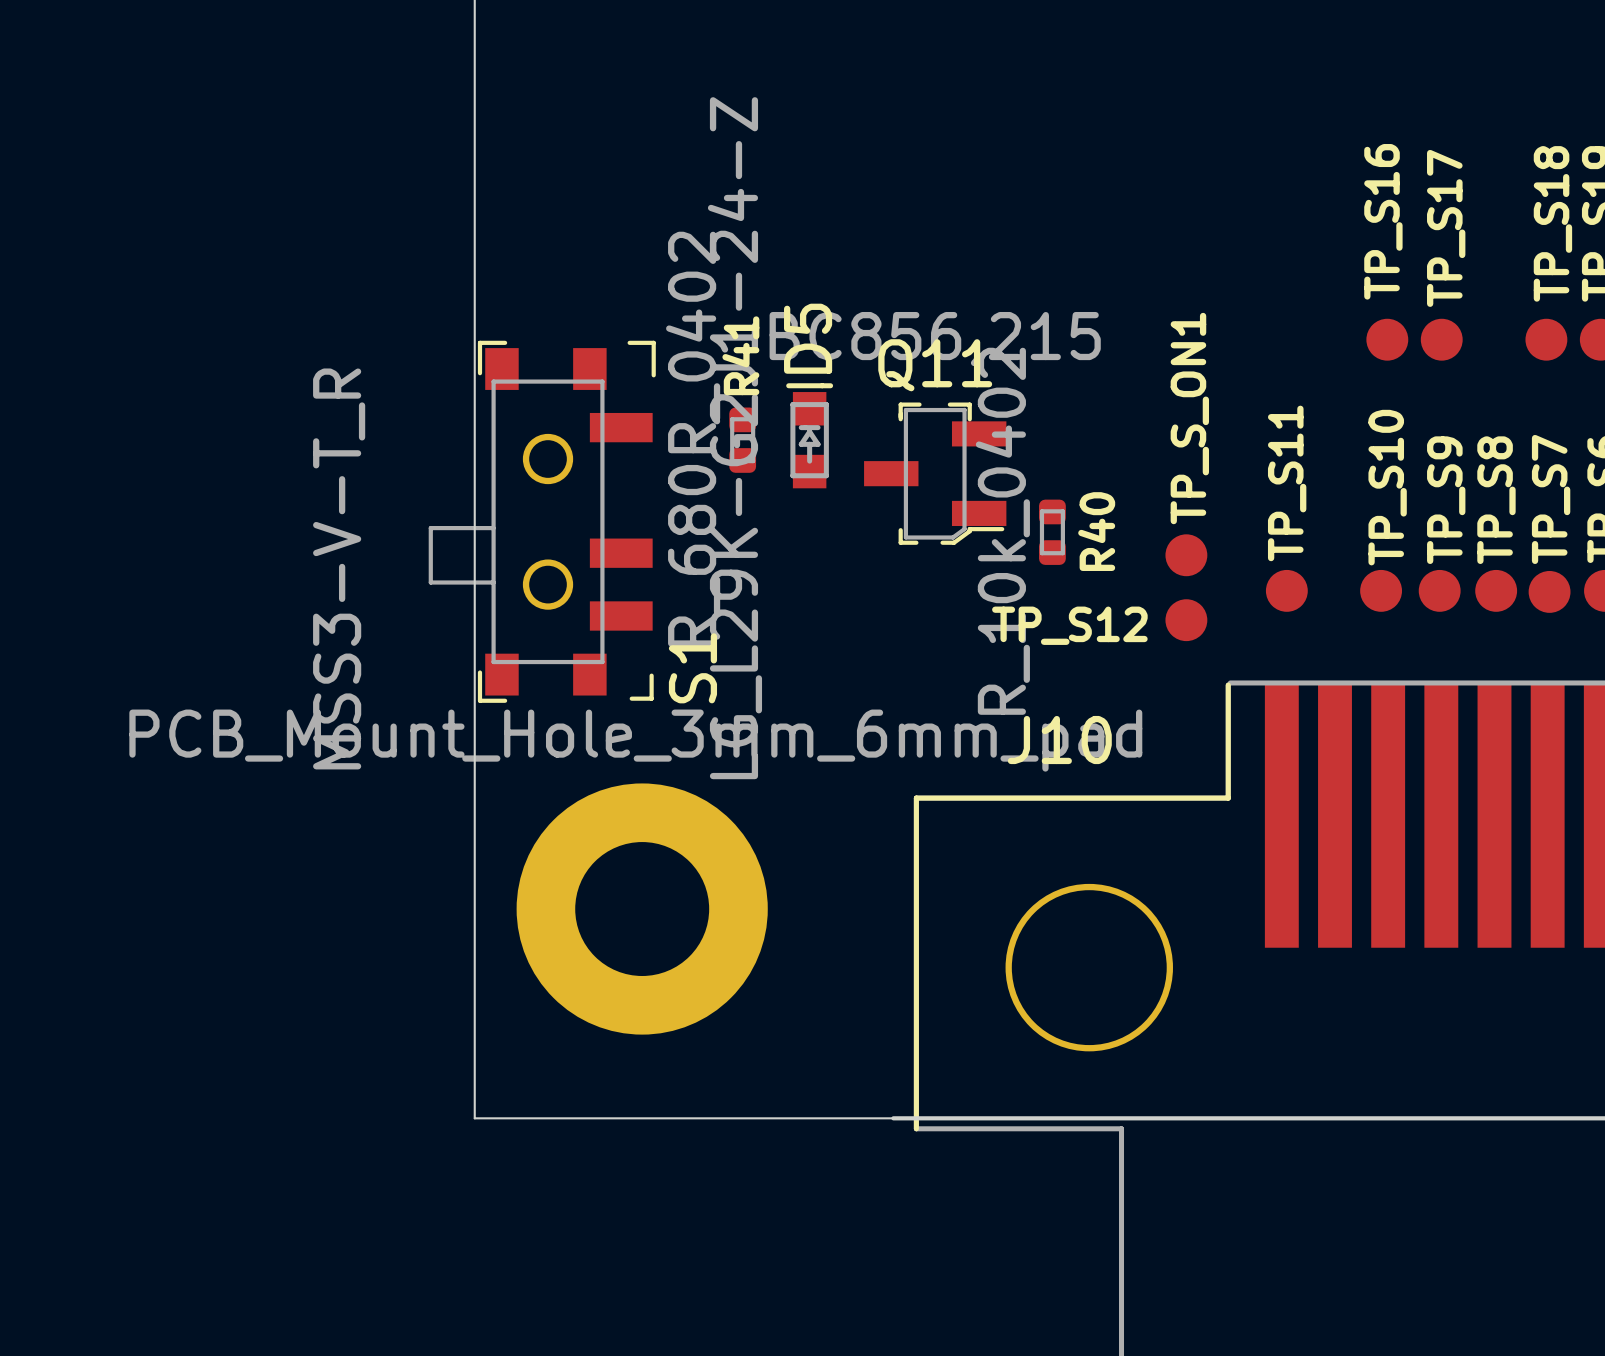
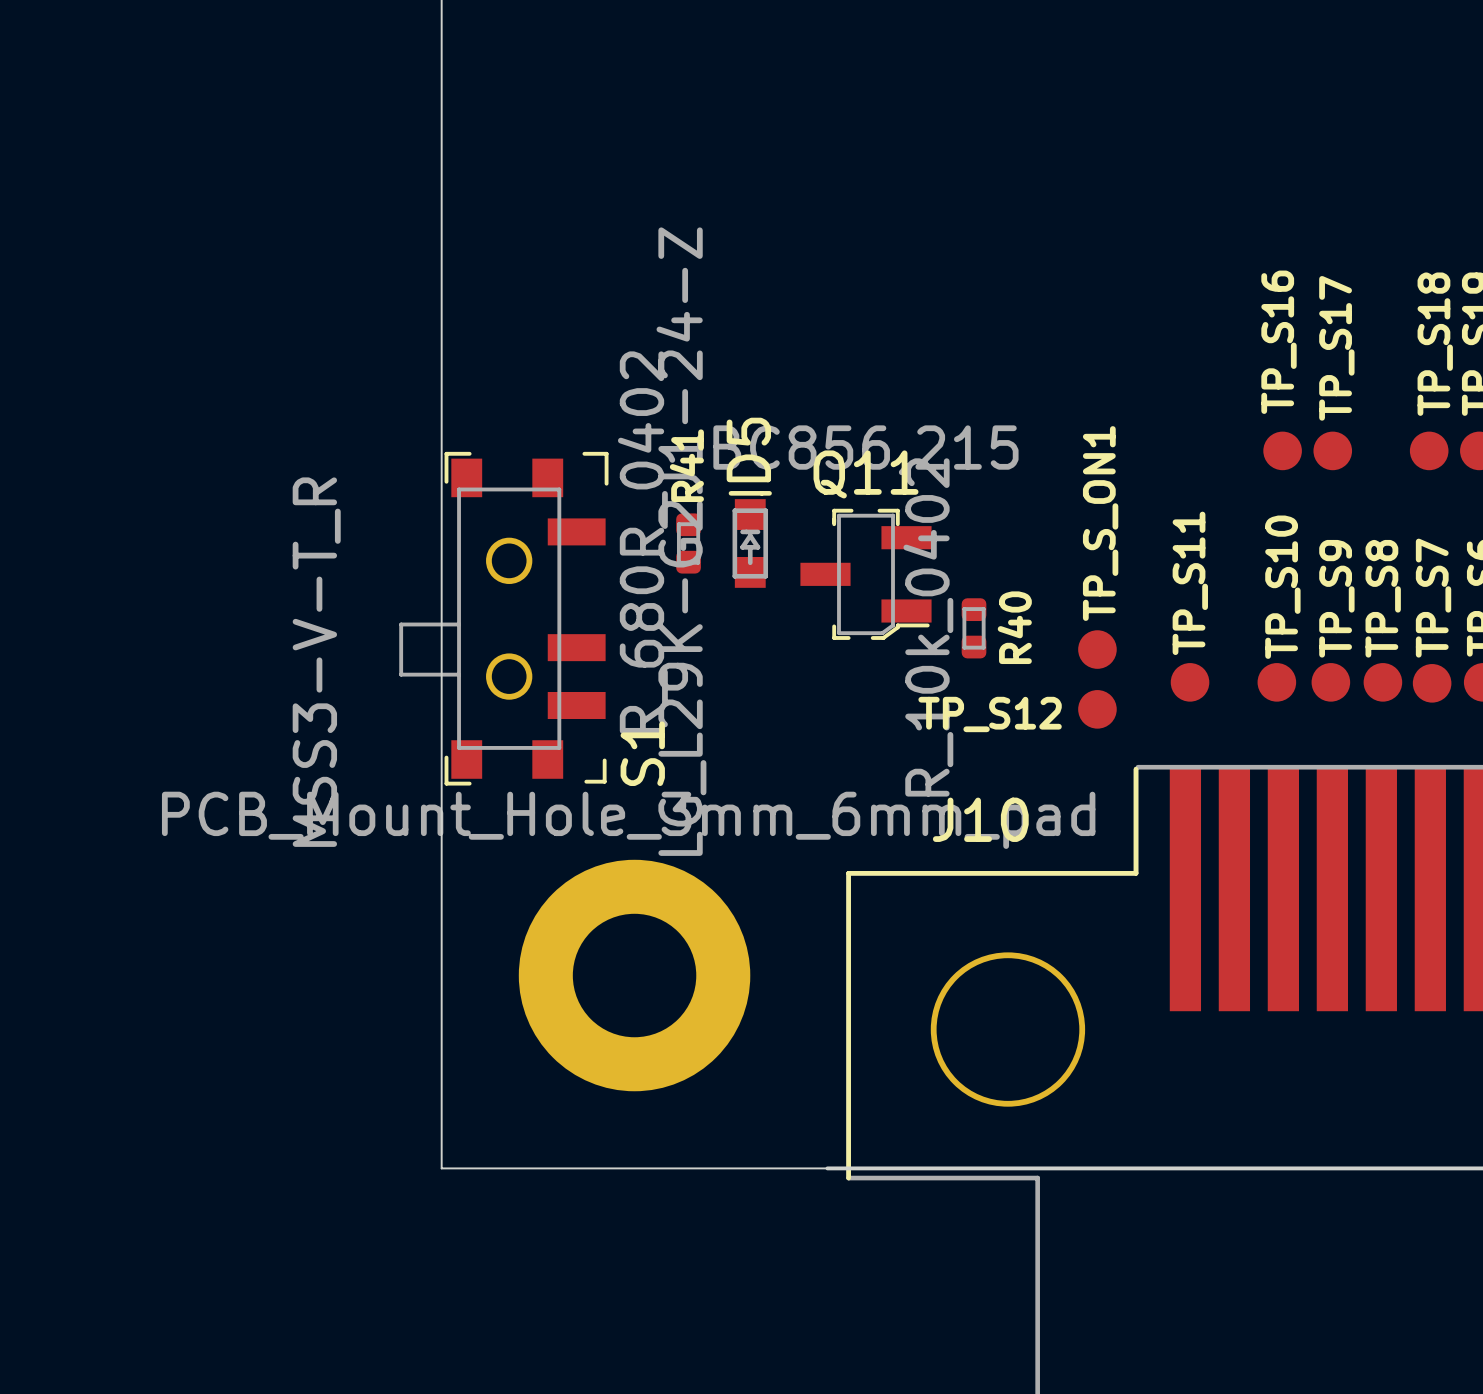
part position: (642, 909) -> (634, 975)

